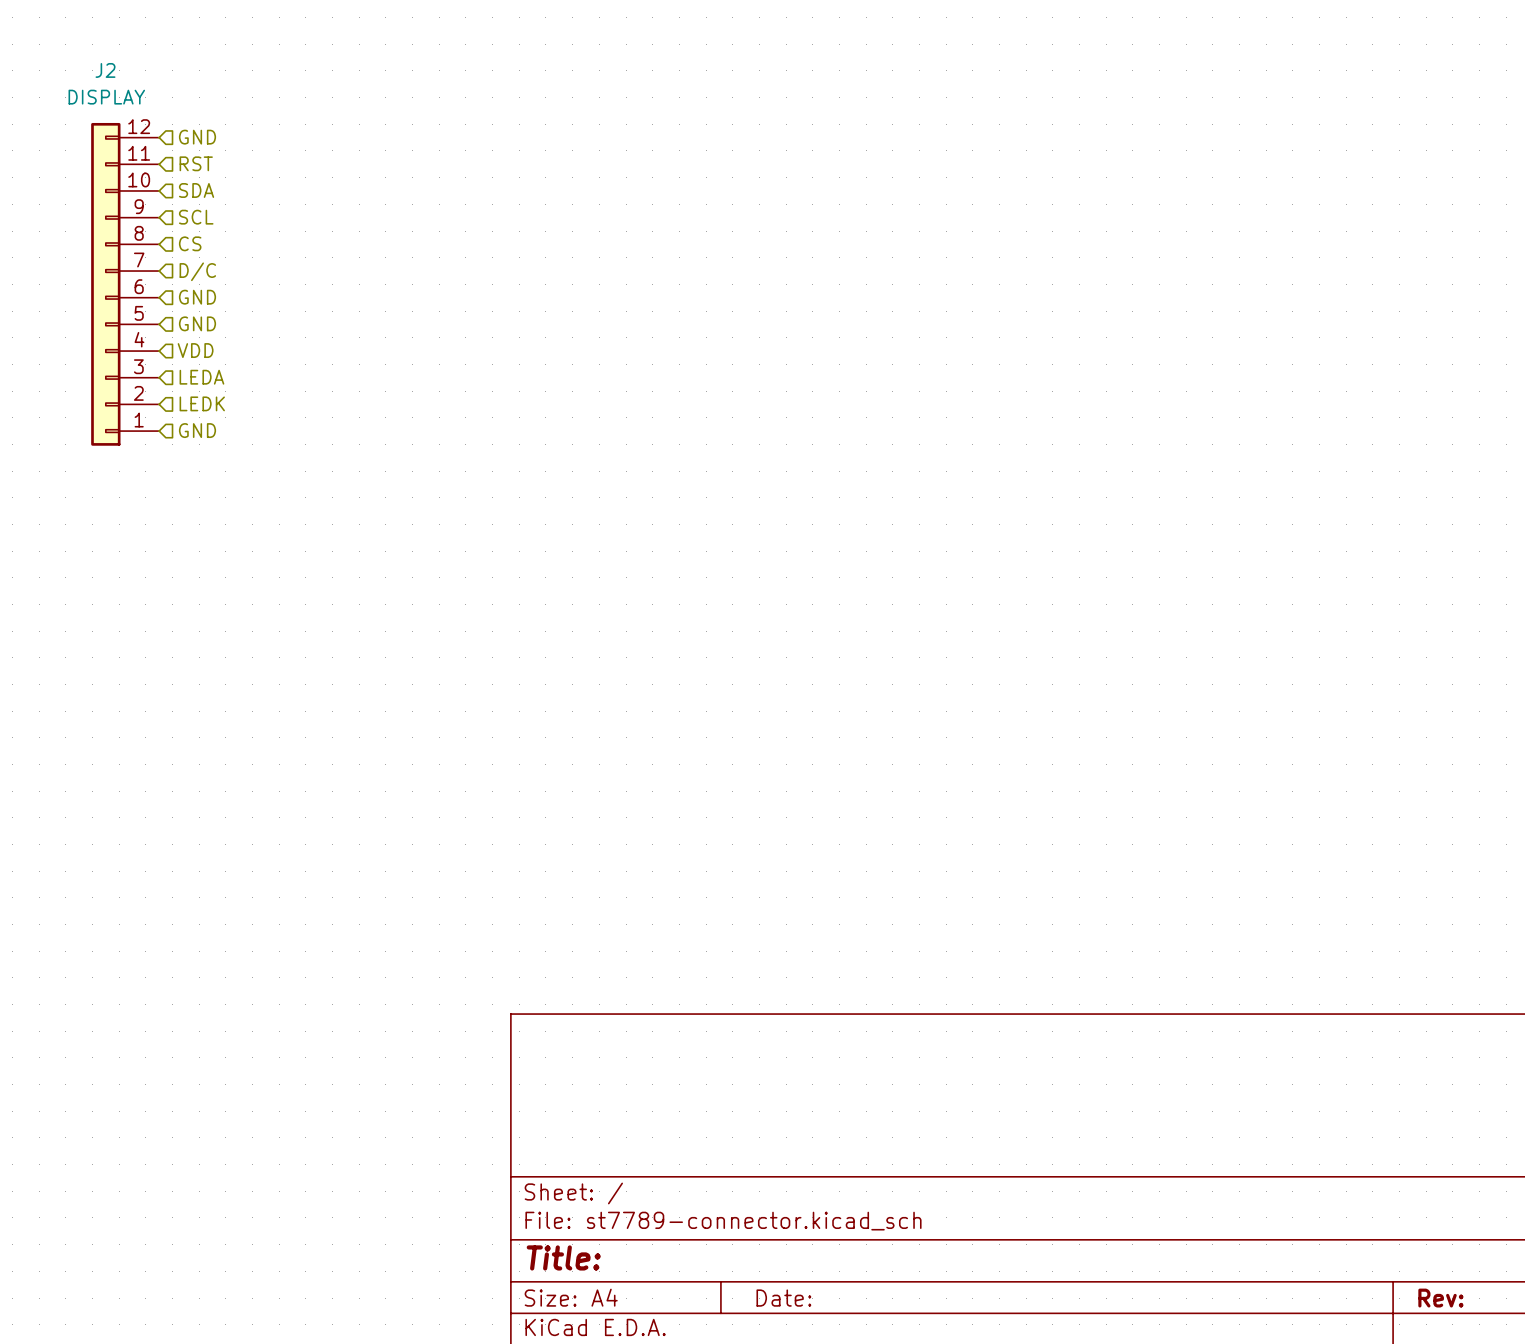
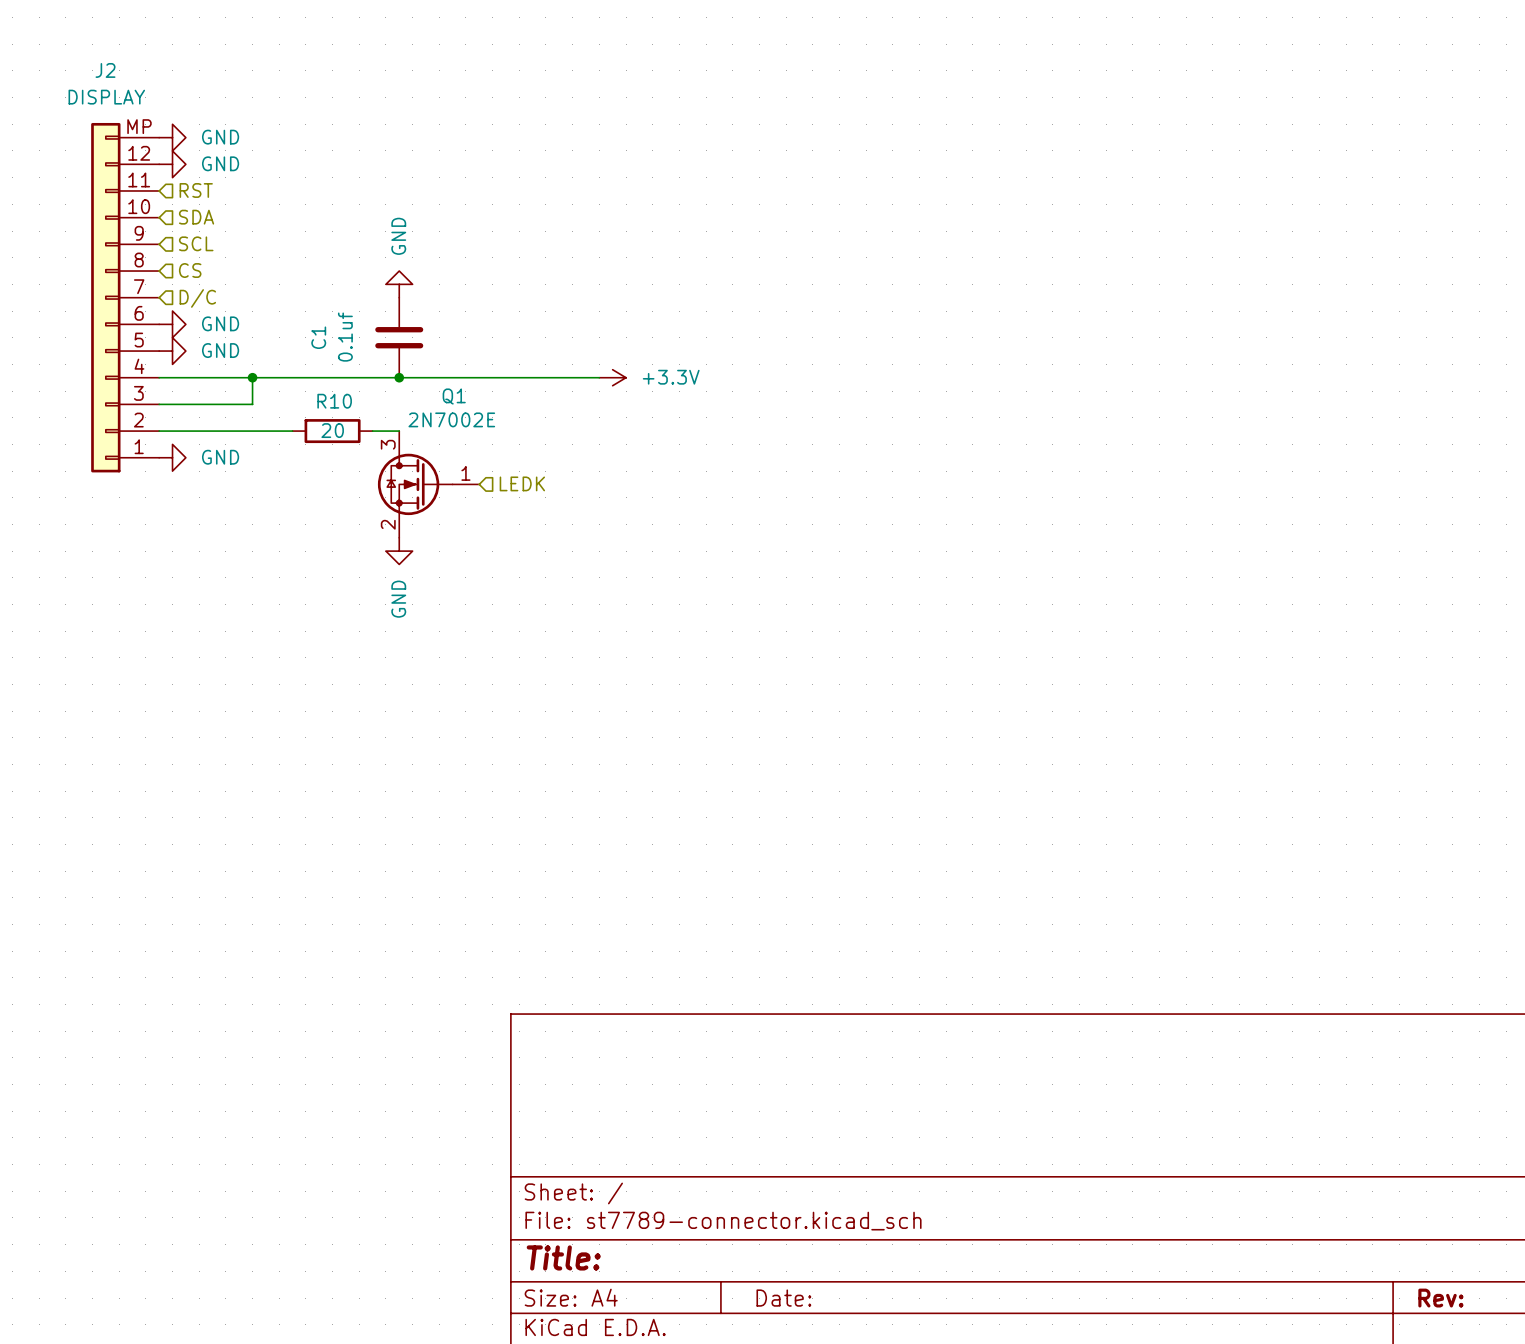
J2 symbol: [91, 122, 160, 446] -> [91, 122, 160, 473]
power symbol: none -> GND (172, 137)
hierarchical label: GND (197, 137) -> none
hierarchical label: RST (196, 163) -> none
power symbol: none -> GND (172, 164)
hierarchical label: SDA (196, 190) -> RST (196, 190)
hierarchical label: SCL (196, 217) -> SDA (196, 217)
hierarchical label: CS (190, 243) -> SCL (196, 243)
hierarchical label: D/C (197, 271) -> CS (190, 270)
power symbol: none -> GND (399, 284)
hierarchical label: GND (197, 297) -> D/C (197, 298)
hierarchical label: GND (197, 323) -> none
power symbol: none -> GND (172, 324)
C1: none -> 0.1uf (399, 337)
hierarchical label: VDD (195, 350) -> none
power symbol: none -> GND (172, 351)
wire: none -> (159, 377) (599, 377)
hierarchical label: LEDA (201, 377) -> none
wire: none -> (252, 377) (252, 404) (159, 404)
junction: none -> (252, 377)
junction: none -> (399, 377)
power symbol: none -> +3.3V (612, 377)
hierarchical label: LEDK (202, 403) -> none
hierarchical label: GND (197, 430) -> none
wire: none -> (159, 431) (292, 431)
R10: none -> 20 (332, 431)
wire: none -> (372, 431) (399, 431)
power symbol: none -> GND (172, 457)
hierarchical label: none -> LEDK (522, 483)
Q1: none -> 2N7002E (428, 484)
power symbol: none -> GND (399, 551)

